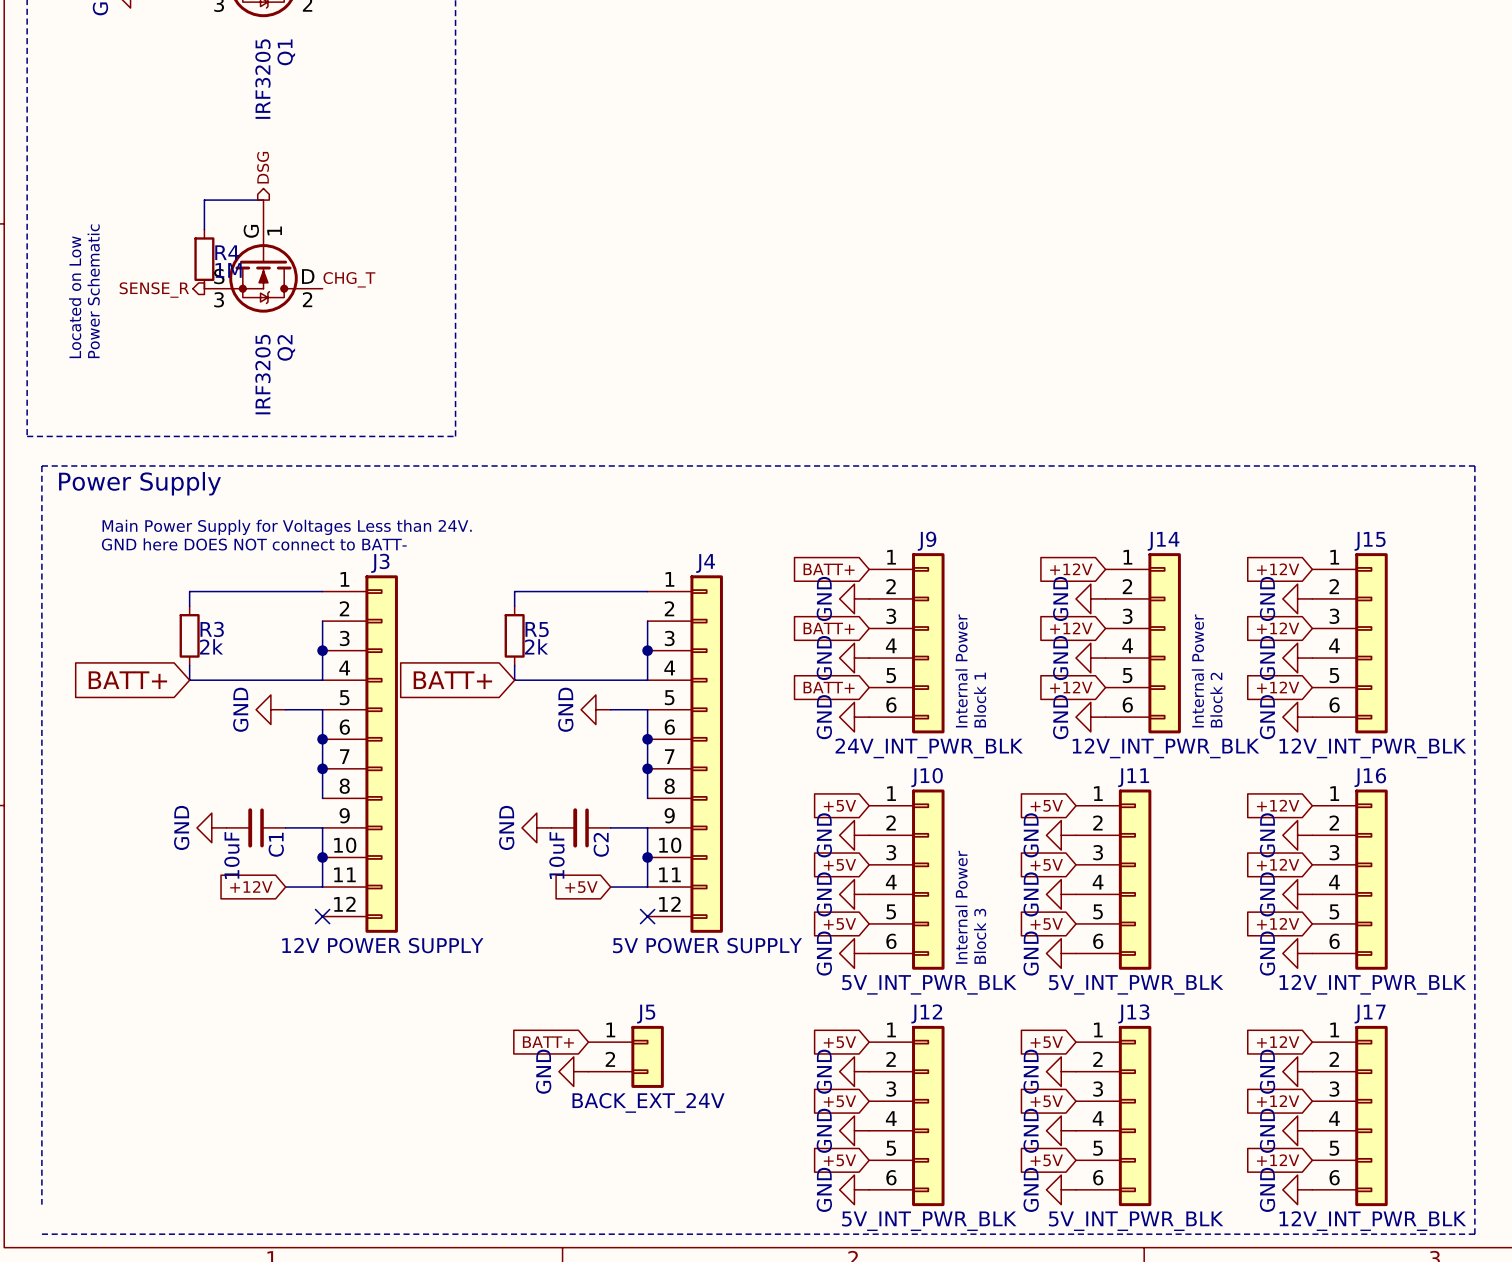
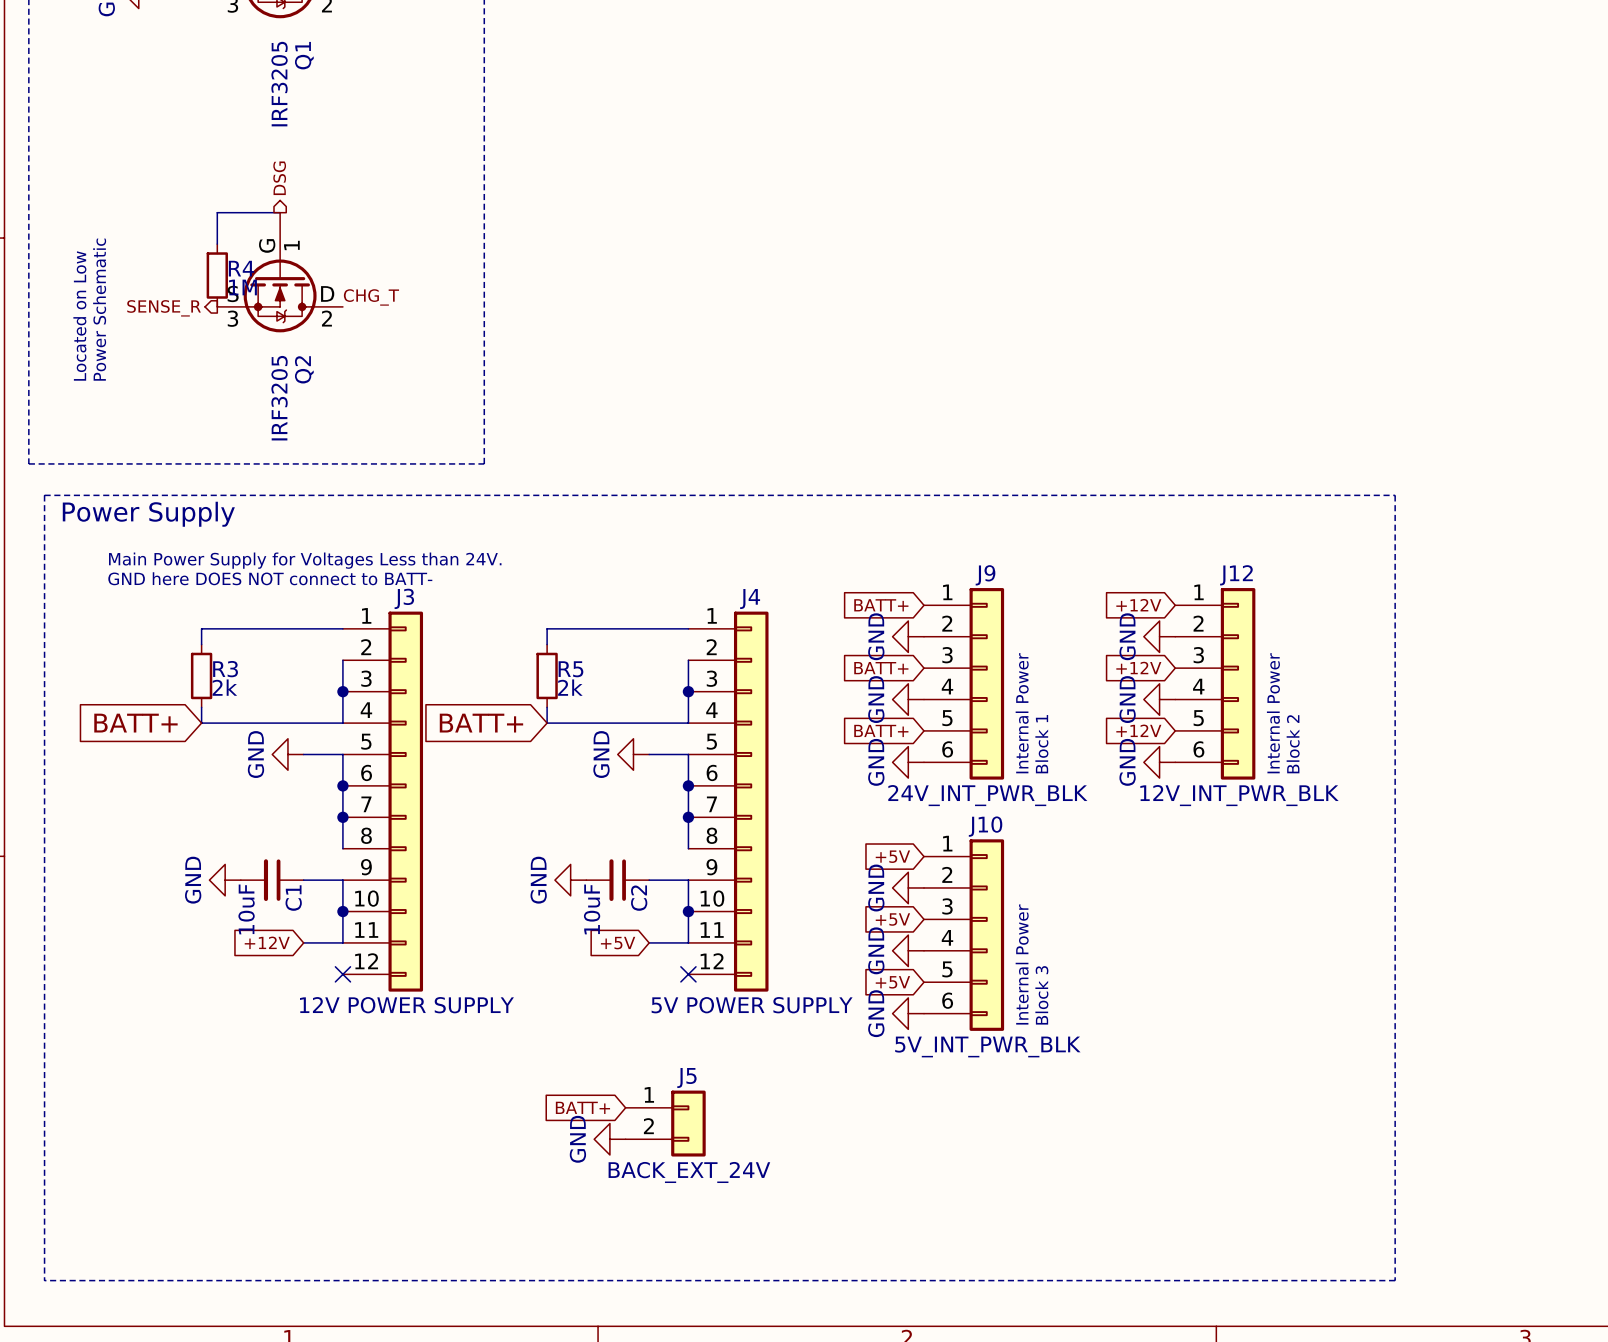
line: (1312, 465) (1474, 465) (1474, 1234) (41, 1234) -> (1395, 495) (1395, 1280) (44, 1280)
J14 name: J14 (1163, 541) -> J12 (1236, 575)
global label: +12V (1278, 569) -> none
power symbol: GND (1297, 598) -> none
global label: +12V (1278, 628) -> none
J15: 12V_INT_PWR_BLK (1350, 643) -> none
power symbol: GND (1297, 658) -> none
global label: +12V (1278, 687) -> none
power symbol: GND (1297, 717) -> none
global label: +5V (1046, 805) -> none
global label: +12V (1278, 805) -> none
power symbol: GND (1061, 835) -> none
power symbol: GND (1297, 835) -> none
global label: +5V (1046, 864) -> none
global label: +12V (1278, 864) -> none
J11: 5V_INT_PWR_BLK (1113, 879) -> none
J16: 12V_INT_PWR_BLK (1350, 879) -> none
power symbol: GND (1061, 894) -> none
power symbol: GND (1297, 894) -> none
global label: +12V (1278, 923) -> none
global label: +5V (1046, 924) -> none
power symbol: GND (1061, 953) -> none
power symbol: GND (1297, 953) -> none
global label: +5V (839, 1042) -> none
global label: +5V (1046, 1042) -> none
global label: +12V (1278, 1042) -> none
power symbol: GND (854, 1071) -> none
power symbol: GND (1061, 1071) -> none
power symbol: GND (1297, 1071) -> none
global label: +5V (839, 1101) -> none
global label: +5V (1046, 1101) -> none
global label: +12V (1278, 1101) -> none
J12: 5V_INT_PWR_BLK (906, 1116) -> none
J13: 5V_INT_PWR_BLK (1113, 1116) -> none
J17: 12V_INT_PWR_BLK (1350, 1116) -> none
power symbol: GND (854, 1130) -> none
power symbol: GND (1061, 1130) -> none
power symbol: GND (1297, 1130) -> none
global label: +5V (839, 1160) -> none
global label: +5V (1046, 1160) -> none
global label: +12V (1278, 1160) -> none
power symbol: GND (854, 1189) -> none
power symbol: GND (1061, 1189) -> none
power symbol: GND (1297, 1189) -> none

